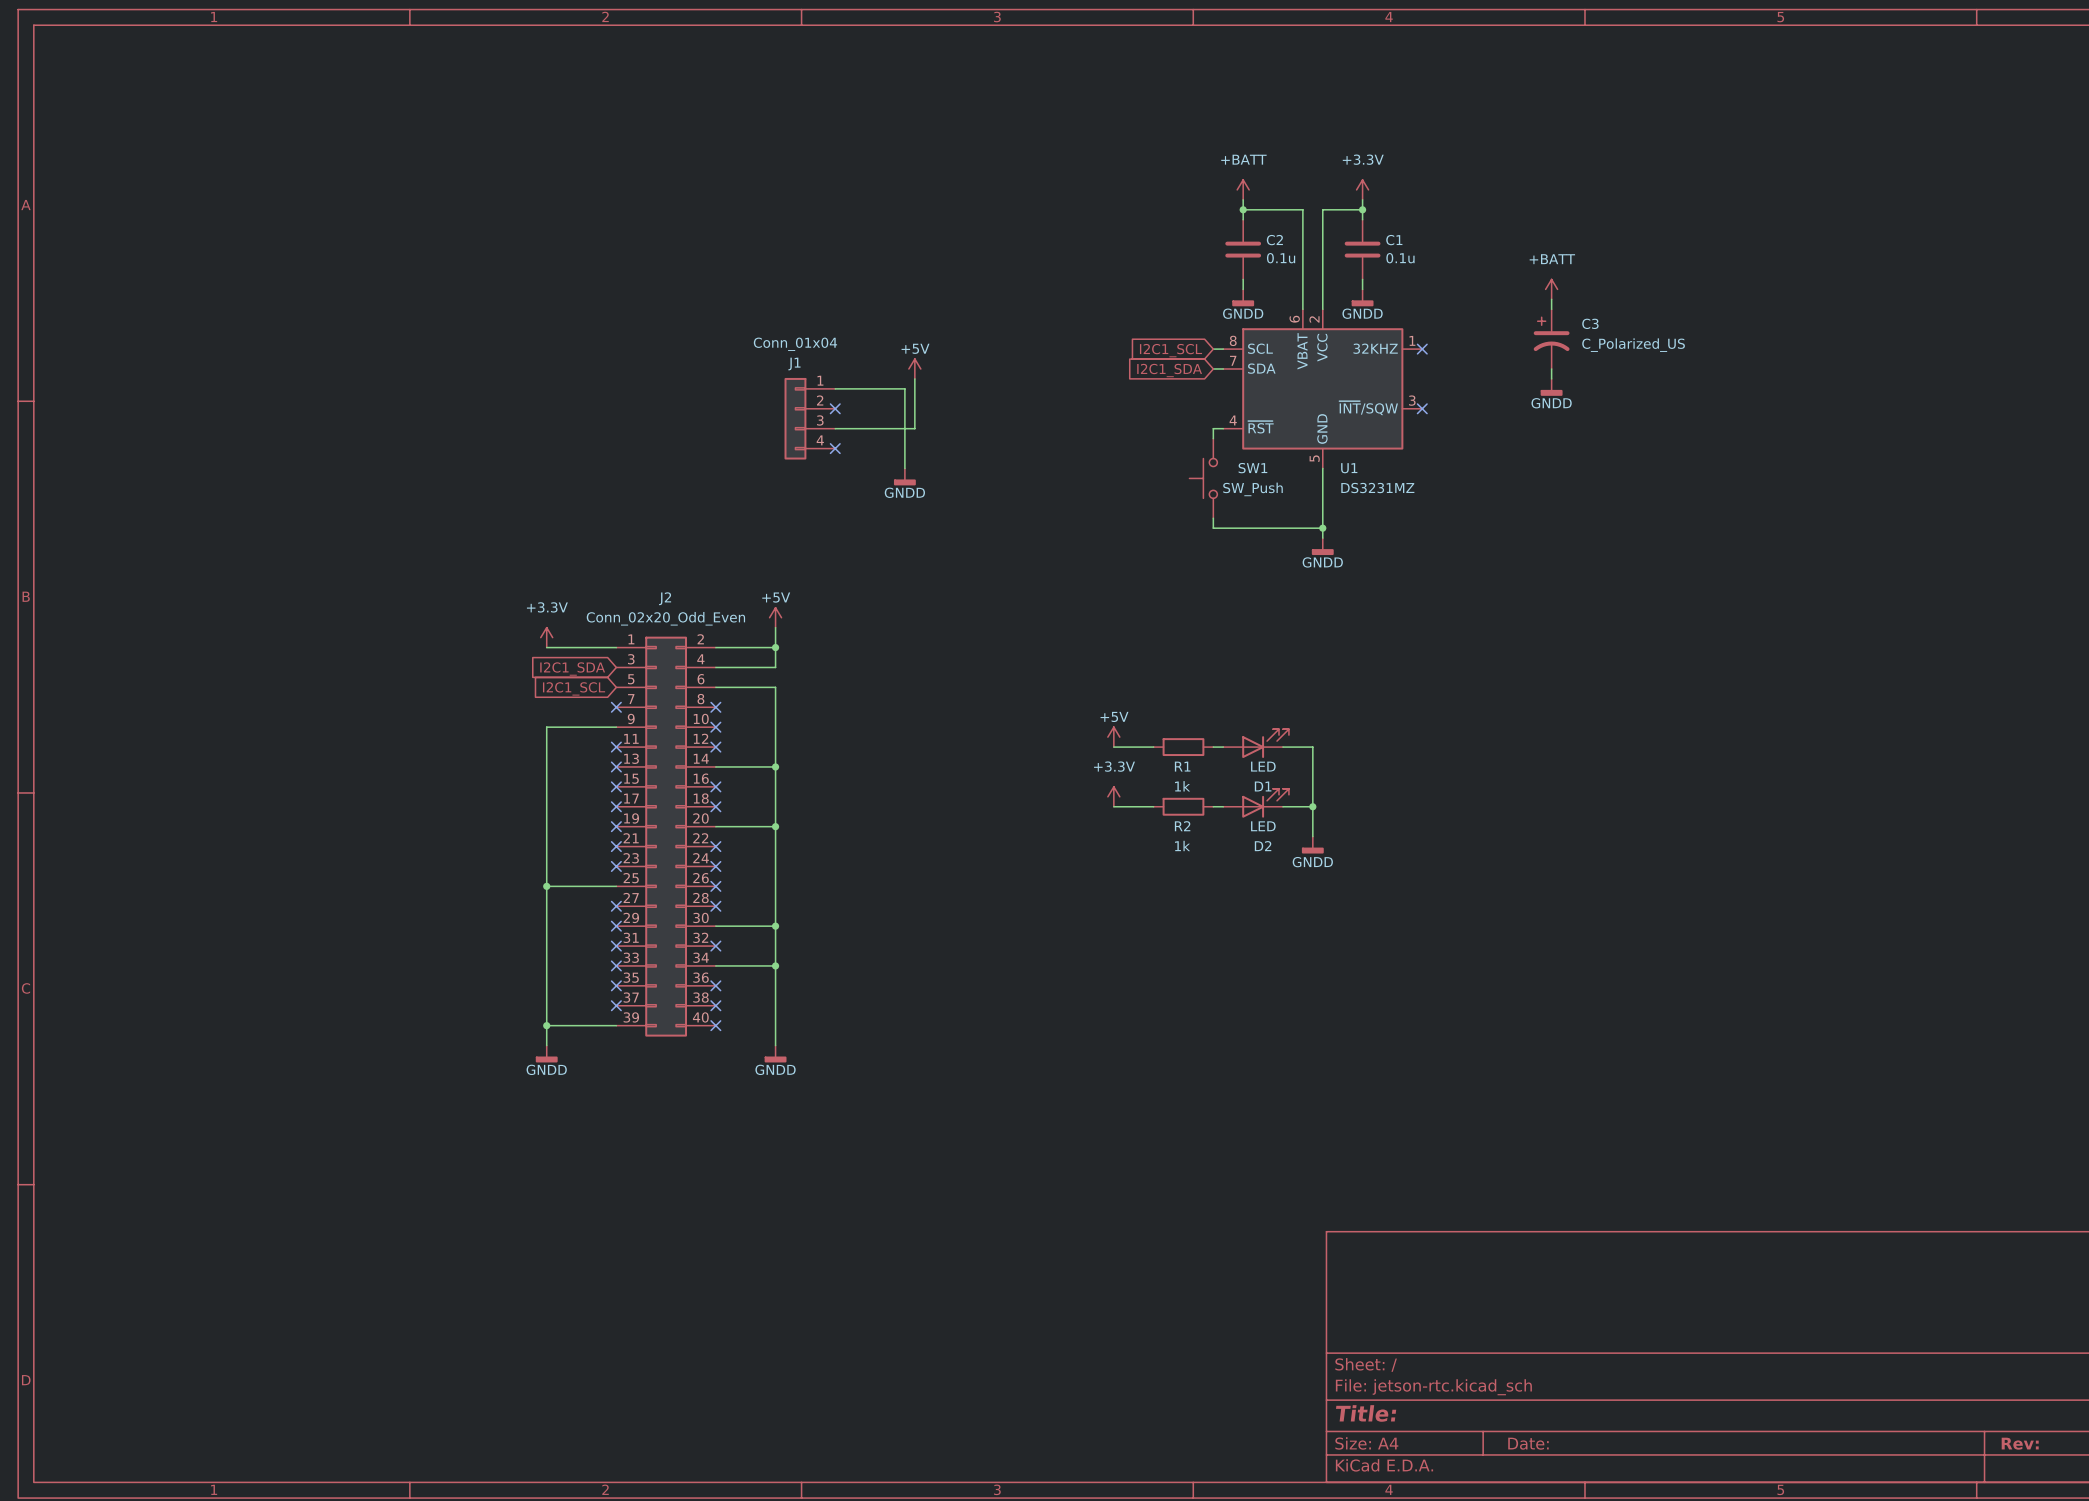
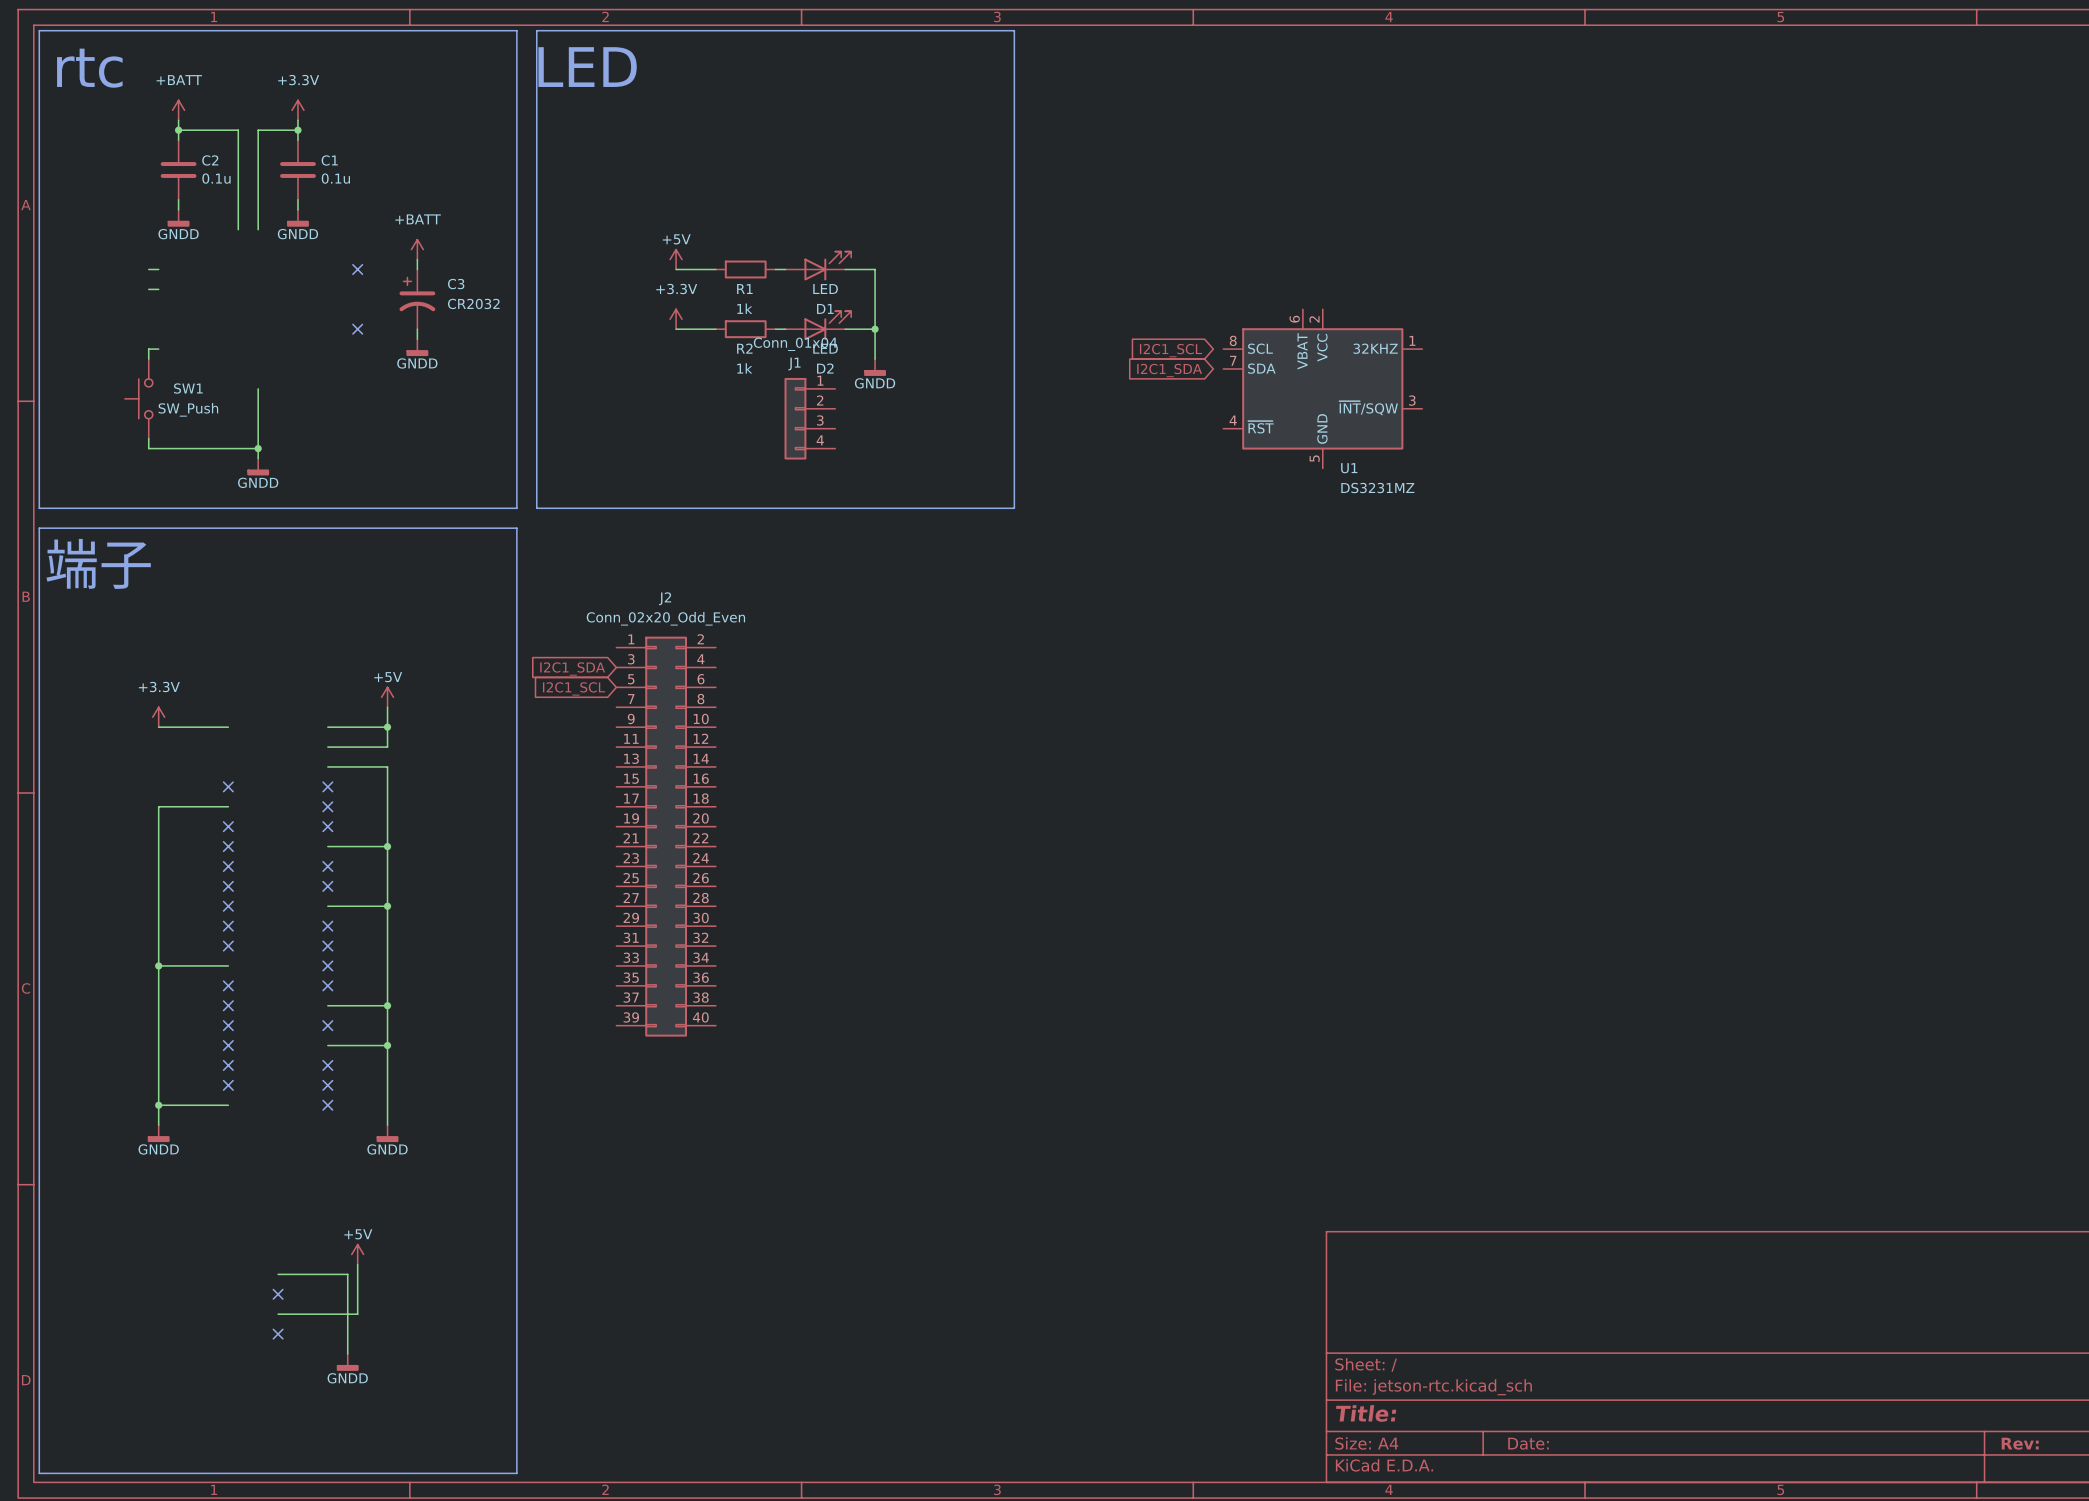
line: none -> (39, 30) (516, 30) (516, 508) (39, 508) (39, 30)
line: none -> (536, 30) (1014, 30) (1014, 508) (536, 508) (536, 30)
text: none -> LED (587, 67)
text: none -> rtc (89, 68)
power symbol: none -> +BATT (178, 110)
power symbol: none -> +3.3V (297, 110)
wire: none -> (178, 120) (178, 140)
wire: none -> (297, 120) (297, 140)
wire: none -> (178, 130) (238, 130) (238, 229)
junction: none -> (178, 130)
wire: none -> (297, 130) (258, 130) (258, 229)
junction: none -> (297, 130)
power symbol: +BATT (1243, 189) -> none
power symbol: +3.3V (1362, 189) -> none
wire: none -> (178, 199) (178, 209)
wire: none -> (297, 199) (297, 209)
wire: (1243, 199) (1243, 219) -> none
wire: (1362, 199) (1362, 219) -> none
wire: (1243, 209) (1302, 209) (1302, 309) -> none
junction: (1243, 209) -> none
wire: (1362, 209) (1322, 209) (1322, 309) -> none
junction: (1362, 209) -> none
power symbol: none -> GNDD (178, 218)
power symbol: none -> GNDD (297, 218)
power symbol: none -> +BATT (417, 249)
C2 position: (1243, 249) -> (178, 170)
C1 position: (1362, 249) -> (297, 170)
wire: none -> (417, 259) (417, 269)
power symbol: none -> +5V (676, 259)
wire: none -> (148, 269) (158, 269)
no-connect mark: none -> (357, 269)
wire: none -> (676, 269) (715, 269)
wire: none -> (775, 269) (785, 269)
wire: none -> (845, 269) (875, 269) (875, 359)
wire: (1243, 279) (1243, 289) -> none
wire: (1362, 279) (1362, 289) -> none
wire: none -> (148, 289) (158, 289)
power symbol: +BATT (1551, 289) -> none
power symbol: GNDD (1243, 297) -> none
power symbol: GNDD (1362, 297) -> none
wire: (1551, 299) (1551, 309) -> none
power symbol: none -> +3.3V (676, 319)
no-connect mark: none -> (357, 329)
wire: none -> (417, 329) (417, 339)
wire: none -> (676, 329) (715, 329)
wire: none -> (775, 329) (785, 329)
wire: none -> (845, 329) (875, 329)
junction: none -> (875, 329)
C3 position: (1551, 339) -> (417, 299)
C3 value: C_Polarized_US (1633, 345) -> CR2032 (473, 303)
power symbol: none -> GNDD (417, 347)
wire: none -> (158, 349) (148, 349) (148, 359)
wire: (1213, 349) (1223, 349) -> none
no-connect mark: (1422, 349) -> none
power symbol: +5V (914, 368) -> none
wire: (1213, 368) (1223, 368) -> none
wire: (1551, 368) (1551, 378) -> none
wire: (914, 378) (914, 428) (835, 428) -> none
power symbol: GNDD (1551, 387) -> none
wire: none -> (258, 388) (258, 458)
wire: (835, 388) (904, 388) (904, 468) -> none
no-connect mark: (835, 408) -> none
no-connect mark: (1422, 408) -> none
wire: (1223, 428) (1213, 428) (1213, 438) -> none
wire: none -> (148, 438) (148, 448) (258, 448)
junction: none -> (258, 448)
no-connect mark: (835, 448) -> none
power symbol: none -> GNDD (258, 466)
wire: (1322, 468) (1322, 538) -> none
power symbol position: GNDD (904, 476) -> GNDD (875, 367)
SW1 position: (1203, 478) -> (138, 398)
wire: (1213, 518) (1213, 528) (1322, 528) -> none
line: none -> (39, 528) (516, 528) (516, 1473) (39, 1473) (39, 528)
junction: (1322, 528) -> none
power symbol: GNDD (1322, 546) -> none
text: none -> 端子 (98, 563)
power symbol: +5V (775, 617) -> none
wire: (775, 627) (775, 667) (715, 667) -> none
power symbol: +3.3V (546, 637) -> none
wire: (546, 647) (616, 647) -> none
wire: (715, 647) (775, 647) -> none
junction: (775, 647) -> none
wire: (715, 687) (775, 687) (775, 1045) -> none
power symbol: none -> +5V (387, 697)
wire: none -> (387, 707) (387, 747) (327, 747)
no-connect mark: (616, 707) -> none
no-connect mark: (715, 707) -> none
power symbol: none -> +3.3V (158, 717)
wire: none -> (158, 727) (228, 727)
wire: none -> (327, 727) (387, 727)
junction: none -> (387, 727)
wire: (616, 727) (546, 727) (546, 1045) -> none
no-connect mark: (715, 727) -> none
power symbol: +5V (1113, 737) -> none
D1 position: (1256, 743) -> (818, 266)
no-connect mark: (616, 747) -> none
no-connect mark: (715, 747) -> none
wire: (1113, 747) (1153, 747) -> none
R1 position: (1183, 747) -> (745, 269)
wire: (1213, 747) (1223, 747) -> none
wire: (1282, 747) (1312, 747) (1312, 836) -> none
wire: none -> (327, 766) (387, 766) (387, 1125)
no-connect mark: (616, 766) -> none
wire: (715, 766) (775, 766) -> none
junction: (775, 766) -> none
no-connect mark: none -> (228, 786)
no-connect mark: none -> (327, 786)
no-connect mark: (616, 786) -> none
no-connect mark: (715, 786) -> none
power symbol: +3.3V (1113, 796) -> none
D2 position: (1256, 803) -> (818, 325)
wire: none -> (228, 806) (158, 806) (158, 1125)
no-connect mark: none -> (327, 806)
no-connect mark: (616, 806) -> none
no-connect mark: (715, 806) -> none
wire: (1113, 806) (1153, 806) -> none
R2 position: (1183, 806) -> (745, 329)
wire: (1213, 806) (1223, 806) -> none
wire: (1282, 806) (1312, 806) -> none
junction: (1312, 806) -> none
no-connect mark: none -> (228, 826)
no-connect mark: none -> (327, 826)
no-connect mark: (616, 826) -> none
wire: (715, 826) (775, 826) -> none
junction: (775, 826) -> none
power symbol: GNDD (1312, 845) -> none
no-connect mark: none -> (228, 846)
wire: none -> (327, 846) (387, 846)
junction: none -> (387, 846)
no-connect mark: (616, 846) -> none
no-connect mark: (715, 846) -> none
no-connect mark: none -> (228, 866)
no-connect mark: none -> (327, 866)
no-connect mark: (616, 866) -> none
no-connect mark: (715, 866) -> none
no-connect mark: none -> (228, 886)
no-connect mark: none -> (327, 886)
wire: (546, 886) (616, 886) -> none
junction: (546, 886) -> none
no-connect mark: (715, 886) -> none
no-connect mark: none -> (228, 906)
wire: none -> (327, 906) (387, 906)
junction: none -> (387, 906)
no-connect mark: (616, 906) -> none
no-connect mark: (715, 906) -> none
no-connect mark: none -> (228, 926)
no-connect mark: none -> (327, 926)
no-connect mark: (616, 926) -> none
wire: (715, 926) (775, 926) -> none
junction: (775, 926) -> none
no-connect mark: none -> (228, 946)
no-connect mark: none -> (327, 946)
no-connect mark: (616, 946) -> none
no-connect mark: (715, 946) -> none
wire: none -> (158, 965) (228, 965)
junction: none -> (158, 965)
no-connect mark: none -> (327, 965)
no-connect mark: (616, 965) -> none
wire: (715, 965) (775, 965) -> none
junction: (775, 965) -> none
no-connect mark: none -> (228, 985)
no-connect mark: none -> (327, 985)
no-connect mark: (616, 985) -> none
no-connect mark: (715, 985) -> none
no-connect mark: none -> (228, 1005)
wire: none -> (327, 1005) (387, 1005)
junction: none -> (387, 1005)
no-connect mark: (616, 1005) -> none
no-connect mark: (715, 1005) -> none
no-connect mark: none -> (228, 1025)
no-connect mark: none -> (327, 1025)
wire: (546, 1025) (616, 1025) -> none
junction: (546, 1025) -> none
no-connect mark: (715, 1025) -> none
no-connect mark: none -> (228, 1045)
wire: none -> (327, 1045) (387, 1045)
junction: none -> (387, 1045)
power symbol position: GNDD (546, 1054) -> GNDD (387, 1133)
power symbol: GNDD (775, 1054) -> none
no-connect mark: none -> (228, 1065)
no-connect mark: none -> (327, 1065)
no-connect mark: none -> (228, 1085)
no-connect mark: none -> (327, 1085)
wire: none -> (158, 1105) (228, 1105)
junction: none -> (158, 1105)
no-connect mark: none -> (327, 1105)
power symbol: none -> GNDD (158, 1133)
power symbol: none -> +5V (357, 1254)
wire: none -> (357, 1264) (357, 1314) (278, 1314)
wire: none -> (278, 1274) (347, 1274) (347, 1353)
no-connect mark: none -> (278, 1294)
no-connect mark: none -> (278, 1334)
power symbol: none -> GNDD (347, 1362)

